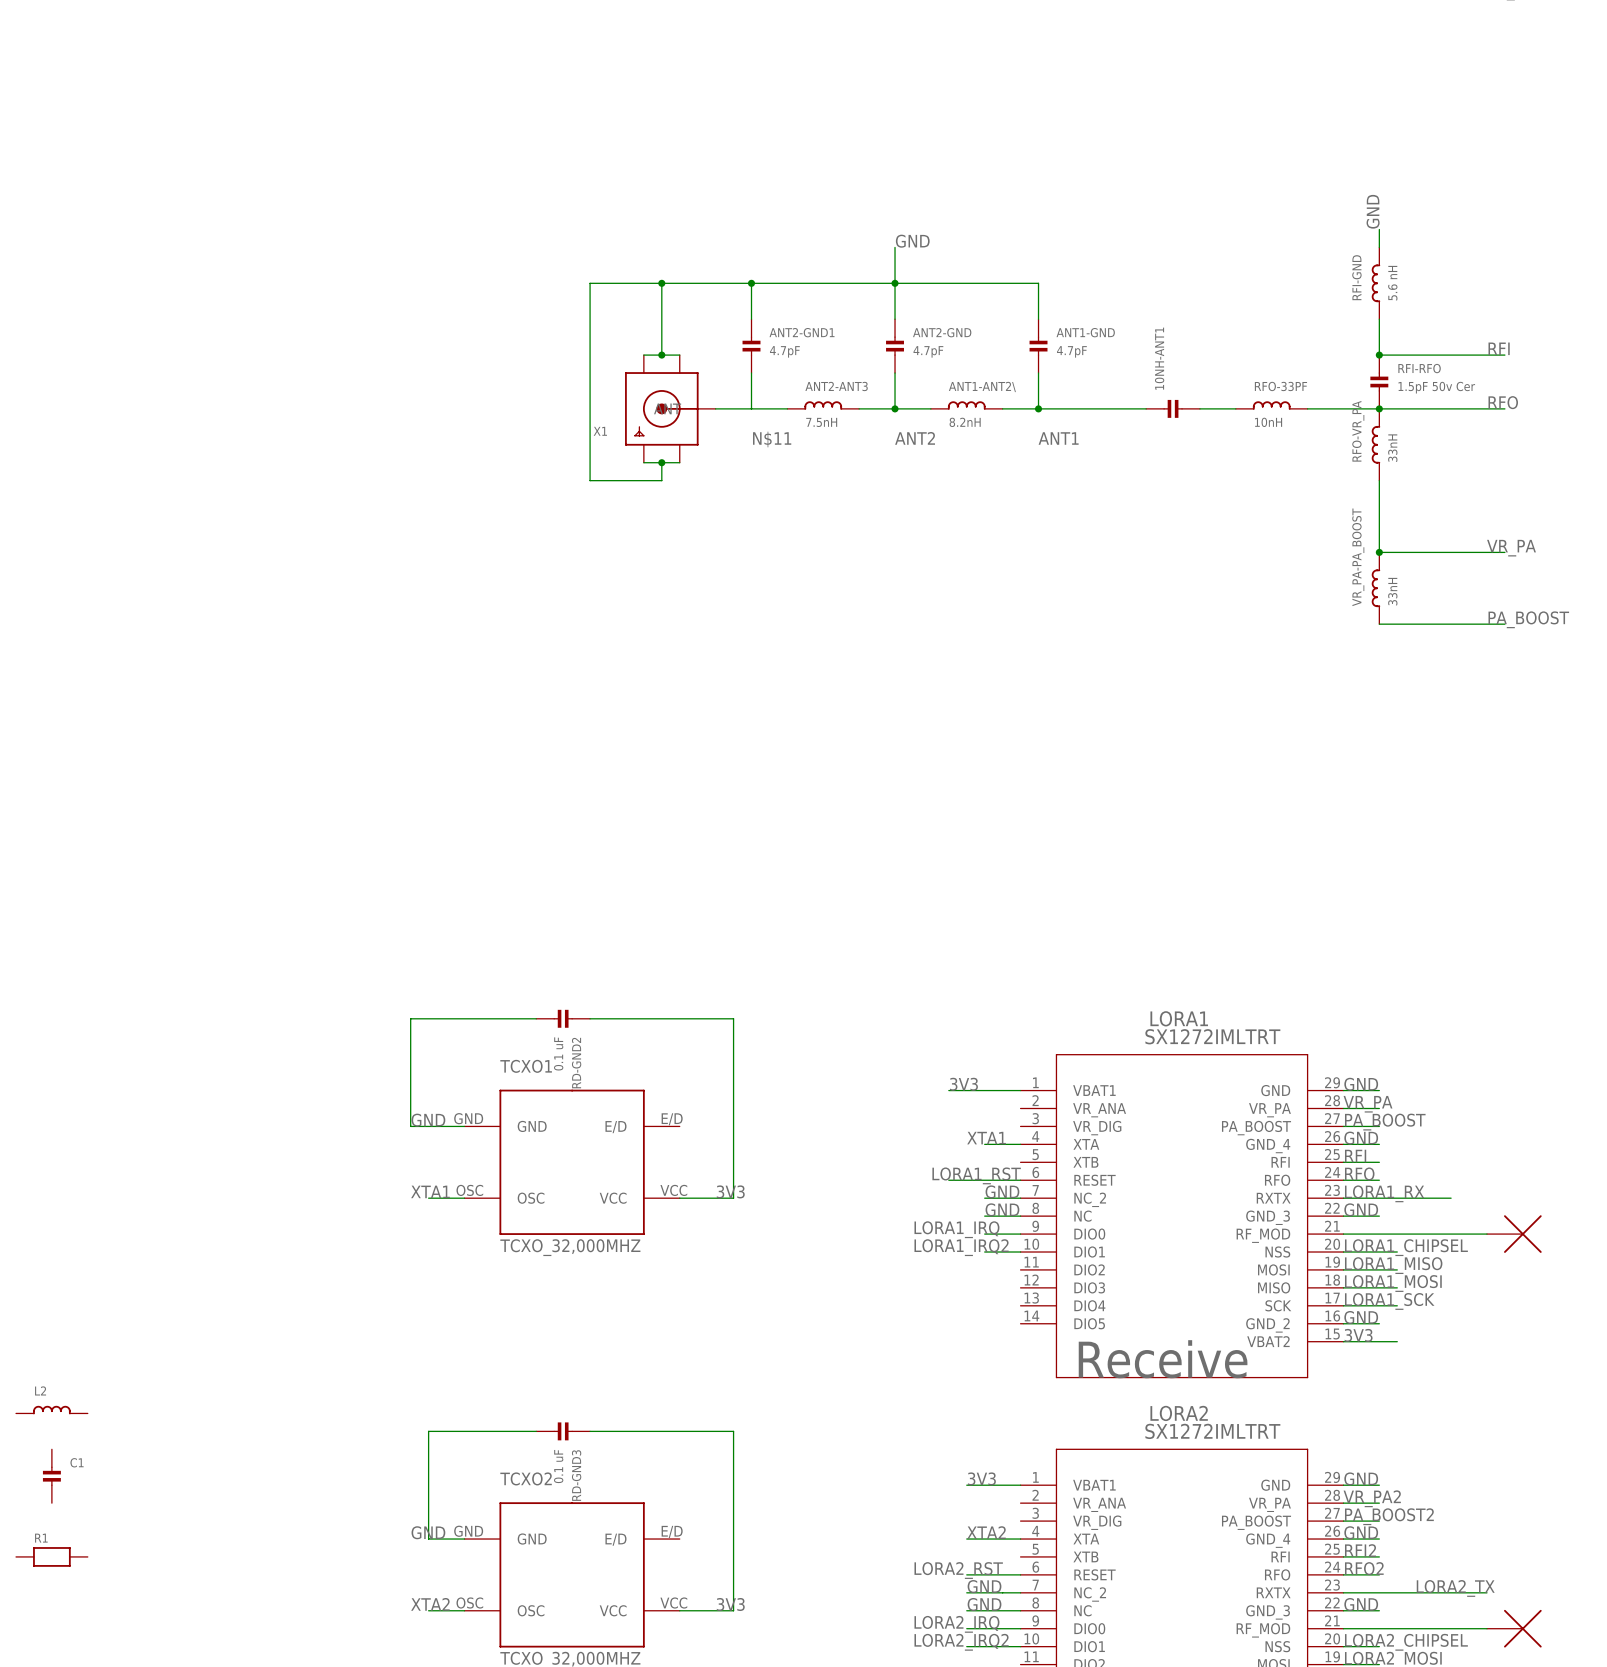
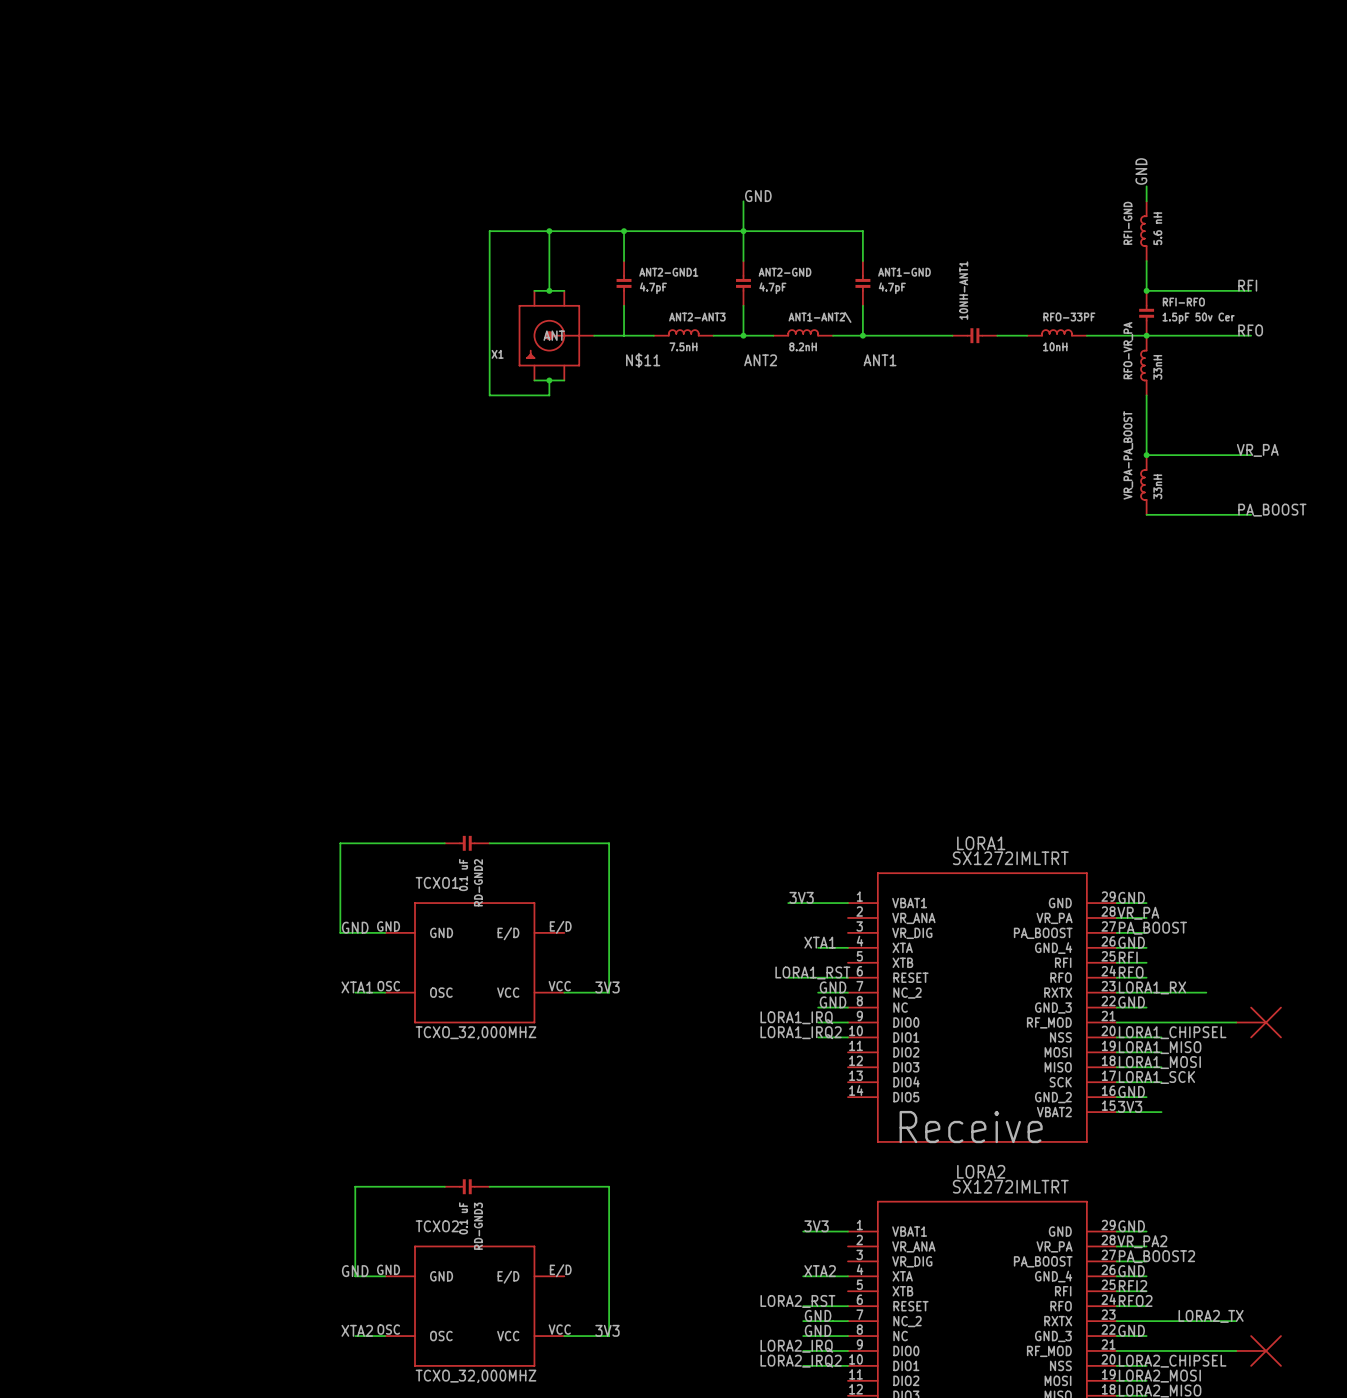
L2: (51, 1410) -> none
C1: (51, 1476) -> none
R1: (51, 1556) -> none

